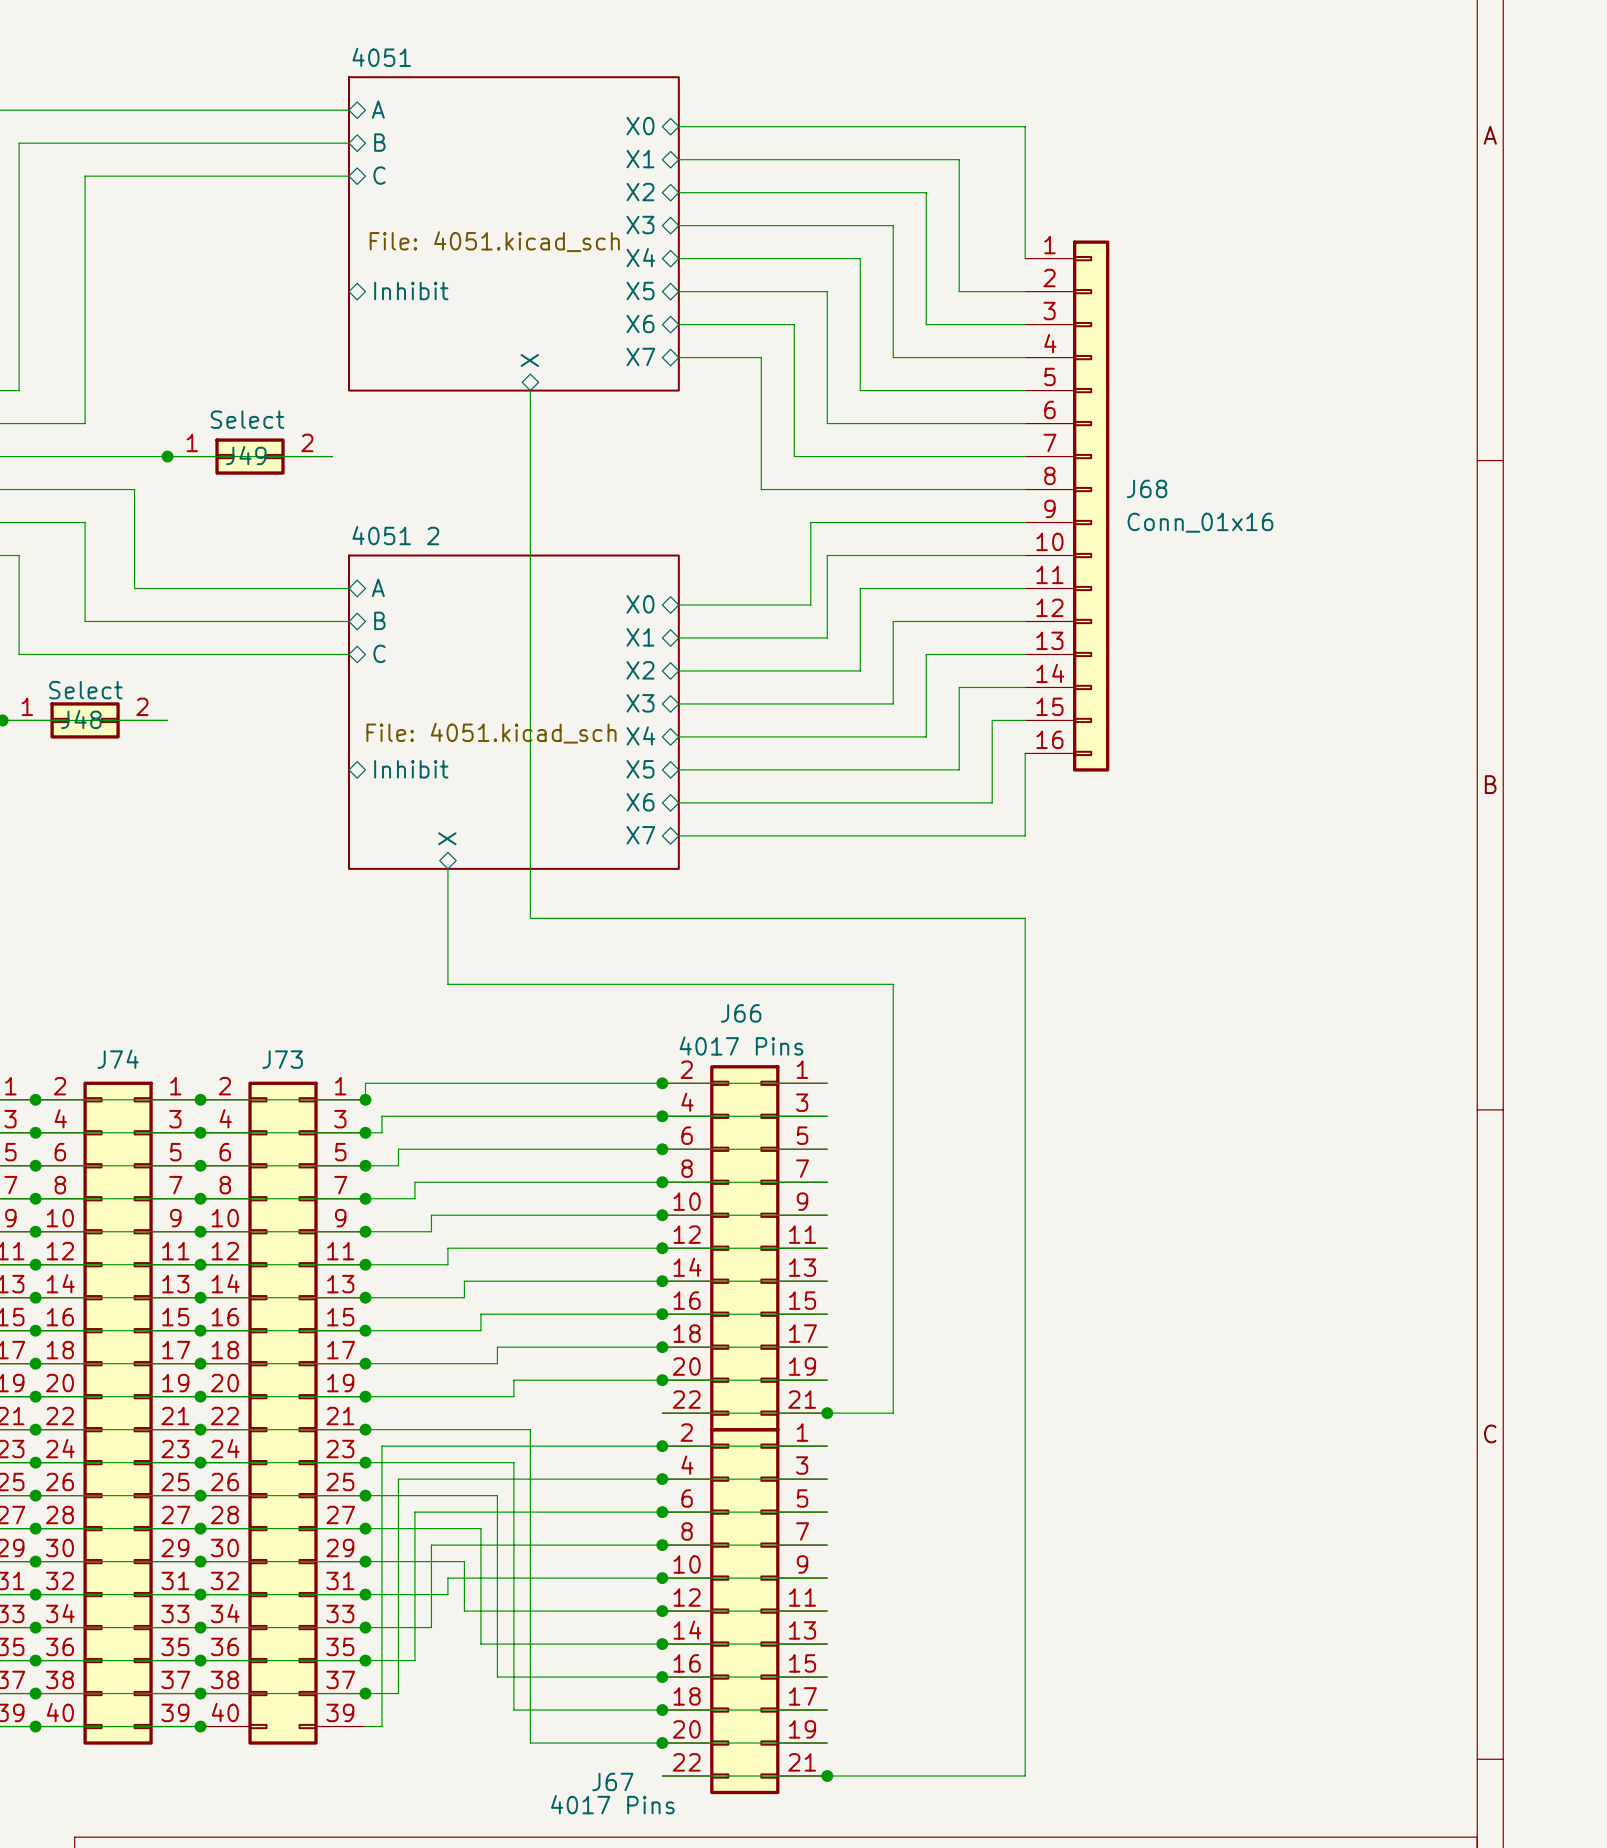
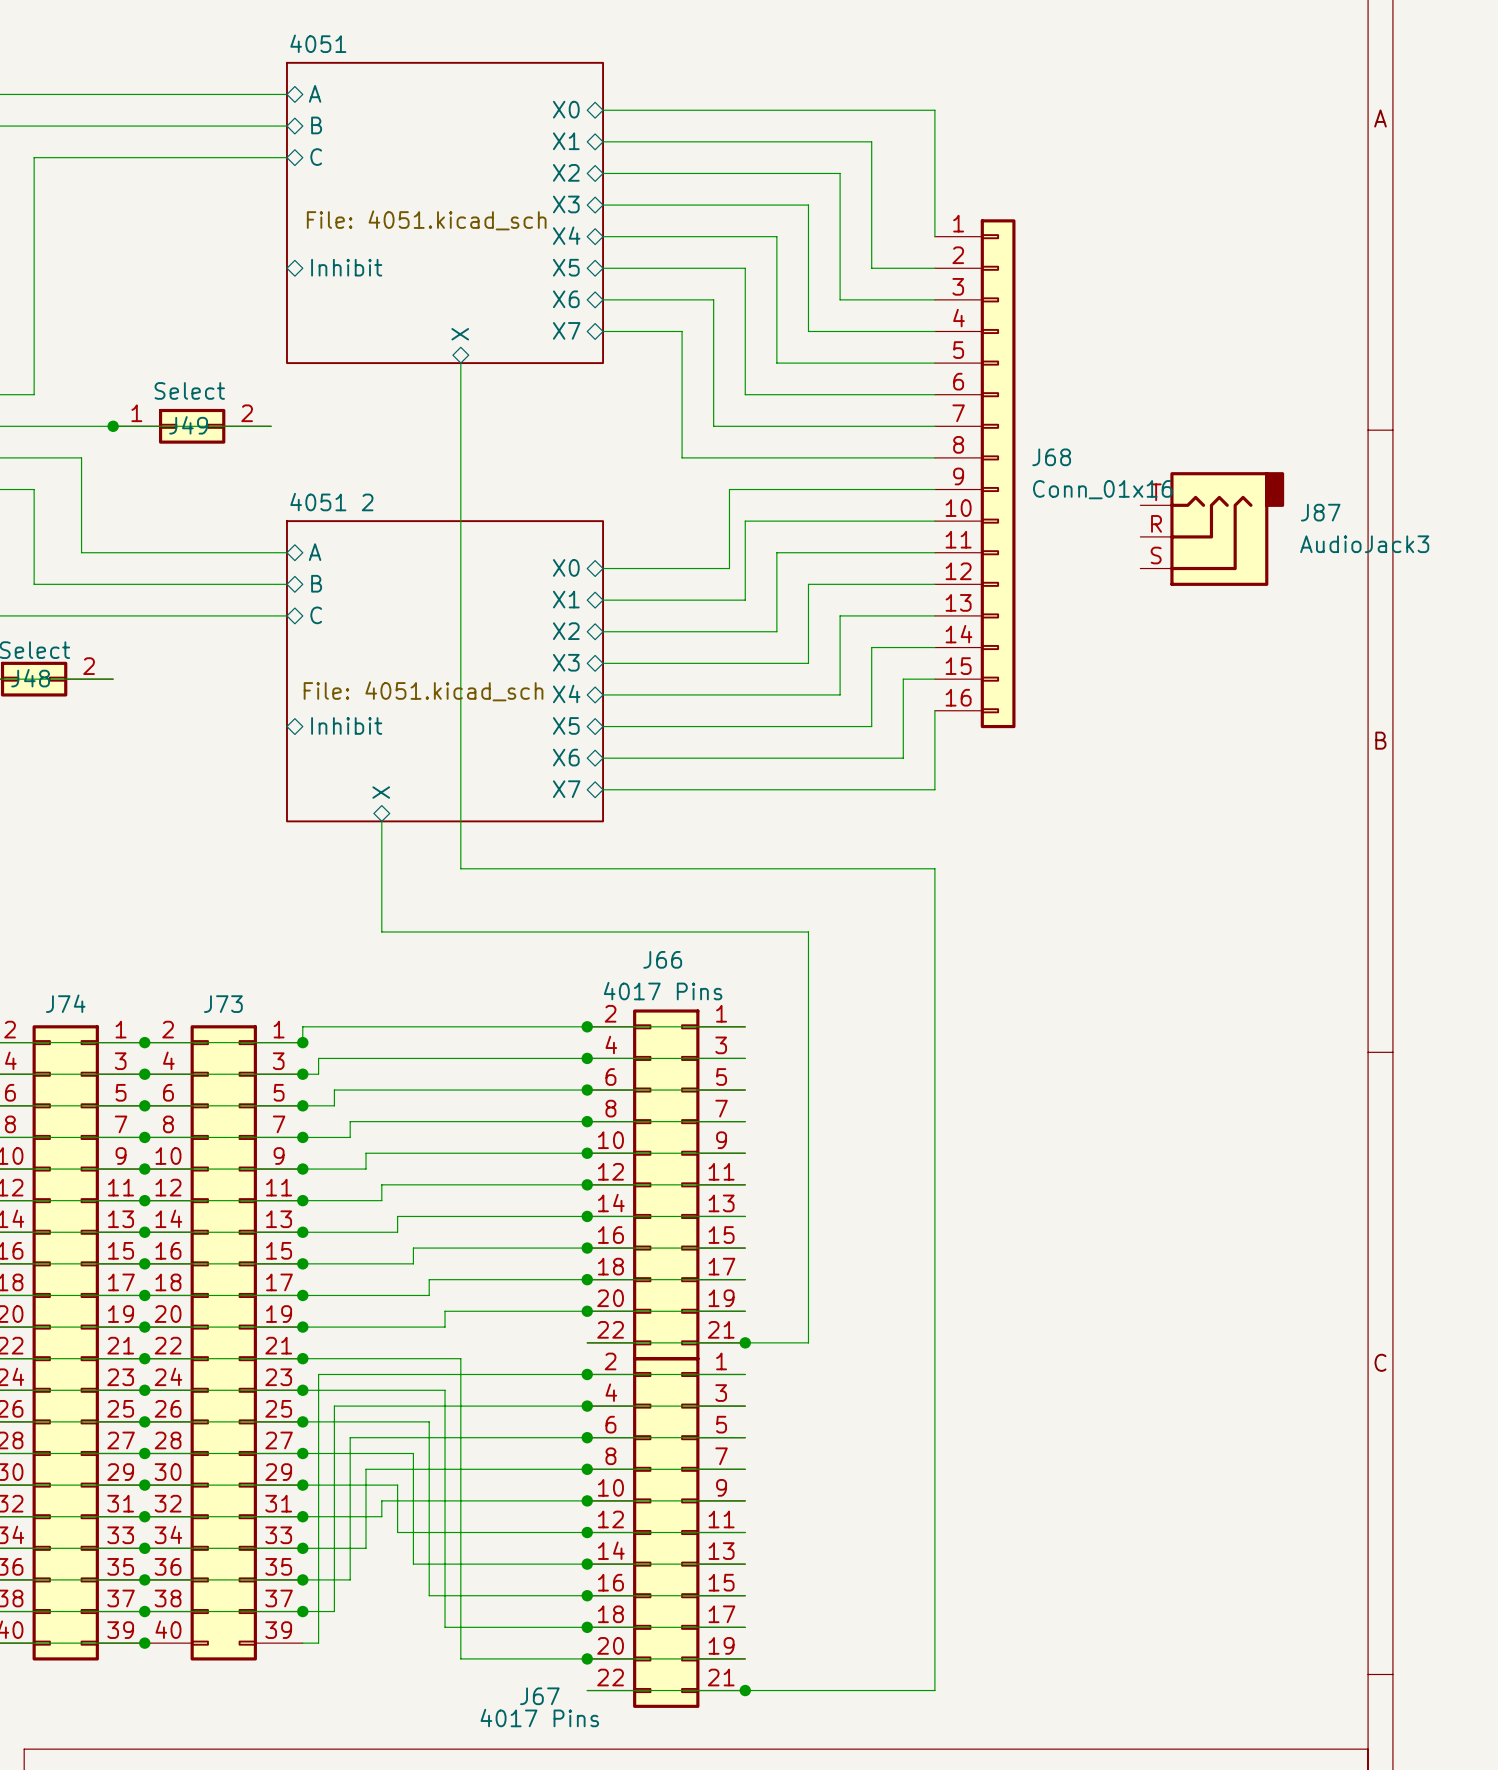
J87: none -> AudioJack3 (1212, 529)

